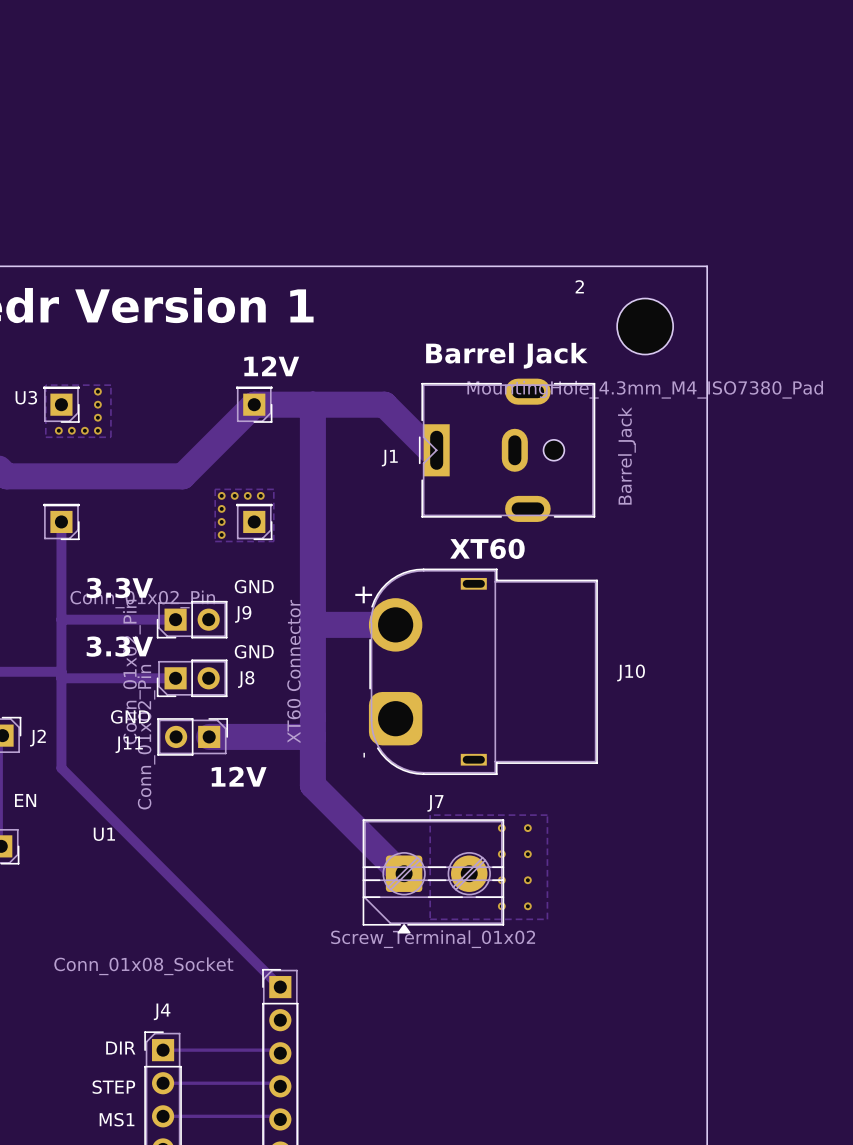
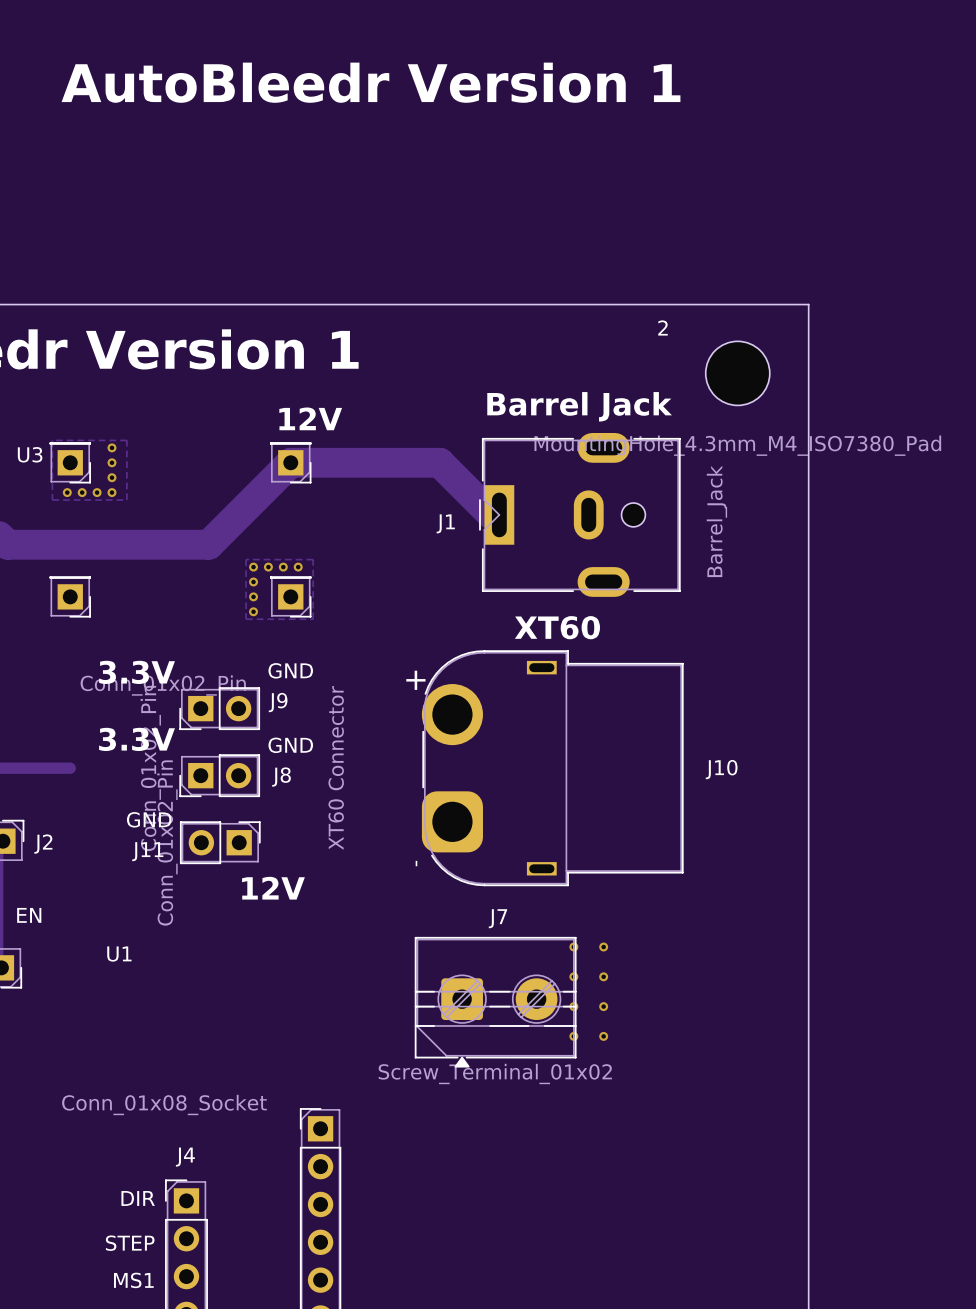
text: none -> AutoBleedr Version 1 (371, 82)
track: (312, 404) (312, 785) (394, 866) -> none
track: (61, 521) (61, 768) (280, 987) -> none
track: (61, 619) (175, 619) -> none
track: (395, 624) (312, 626) -> none
track: (61, 678) (175, 678) -> none
track: (209, 736) (312, 736) -> none
zone outline: (430, 815) (430, 919) (547, 919) (547, 815) (430, 815) -> none
track: (163, 1050) (277, 1050) -> none
track: (163, 1083) (277, 1083) -> none
track: (163, 1116) (277, 1116) -> none

